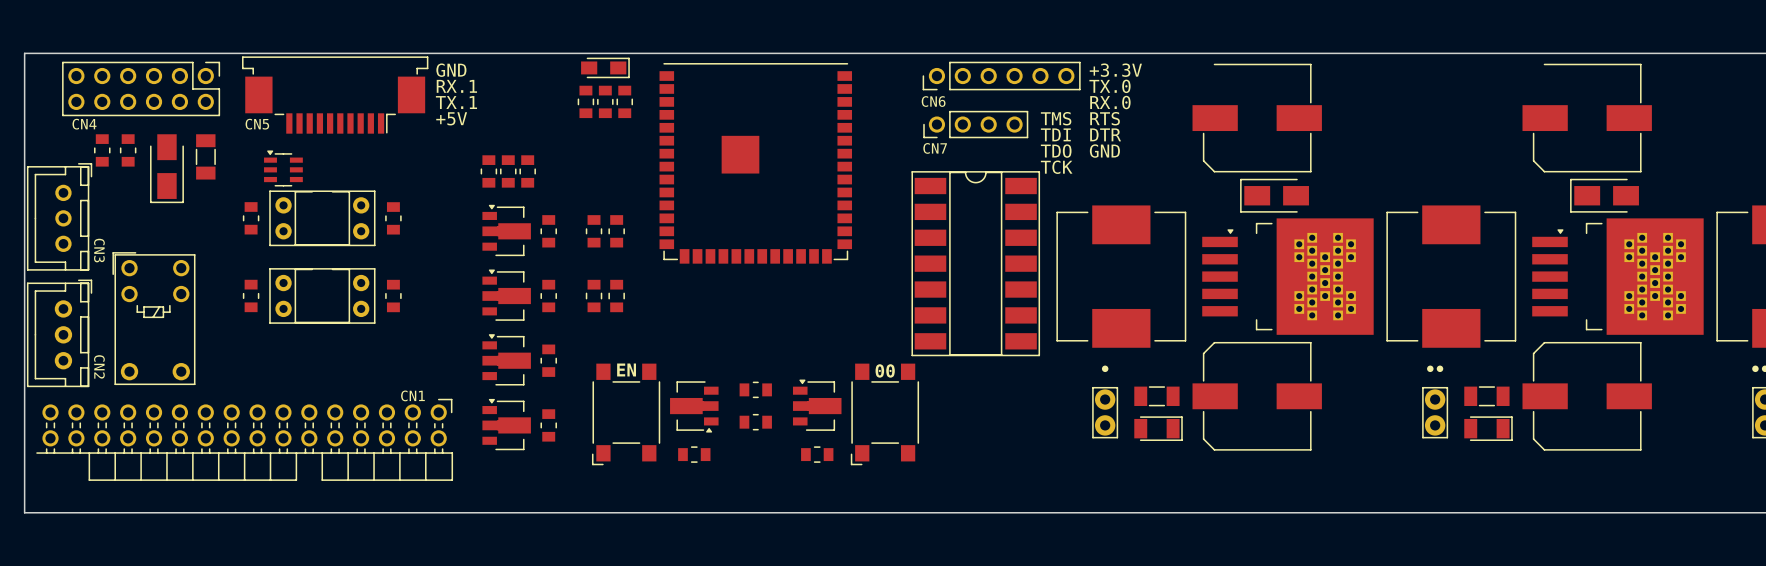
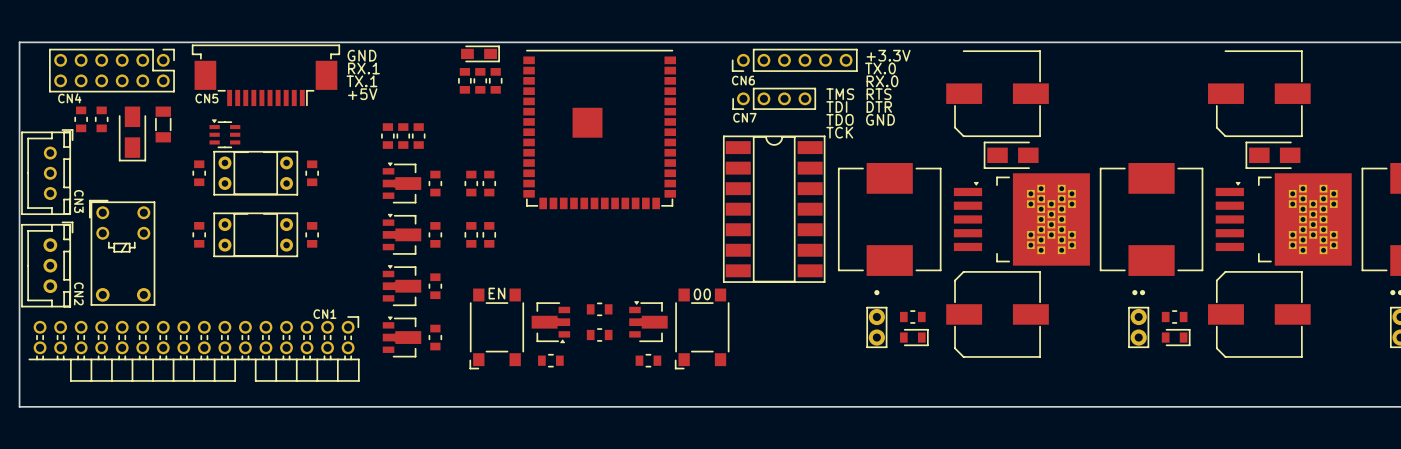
part footprint: [1134, 386, 1180, 407] -> [899, 310, 926, 324]
part footprint: [1464, 386, 1510, 407] -> [1161, 310, 1188, 324]
part footprint: [1134, 416, 1183, 441] -> [899, 329, 929, 346]
part footprint: [1464, 416, 1513, 441] -> [1161, 329, 1191, 346]

